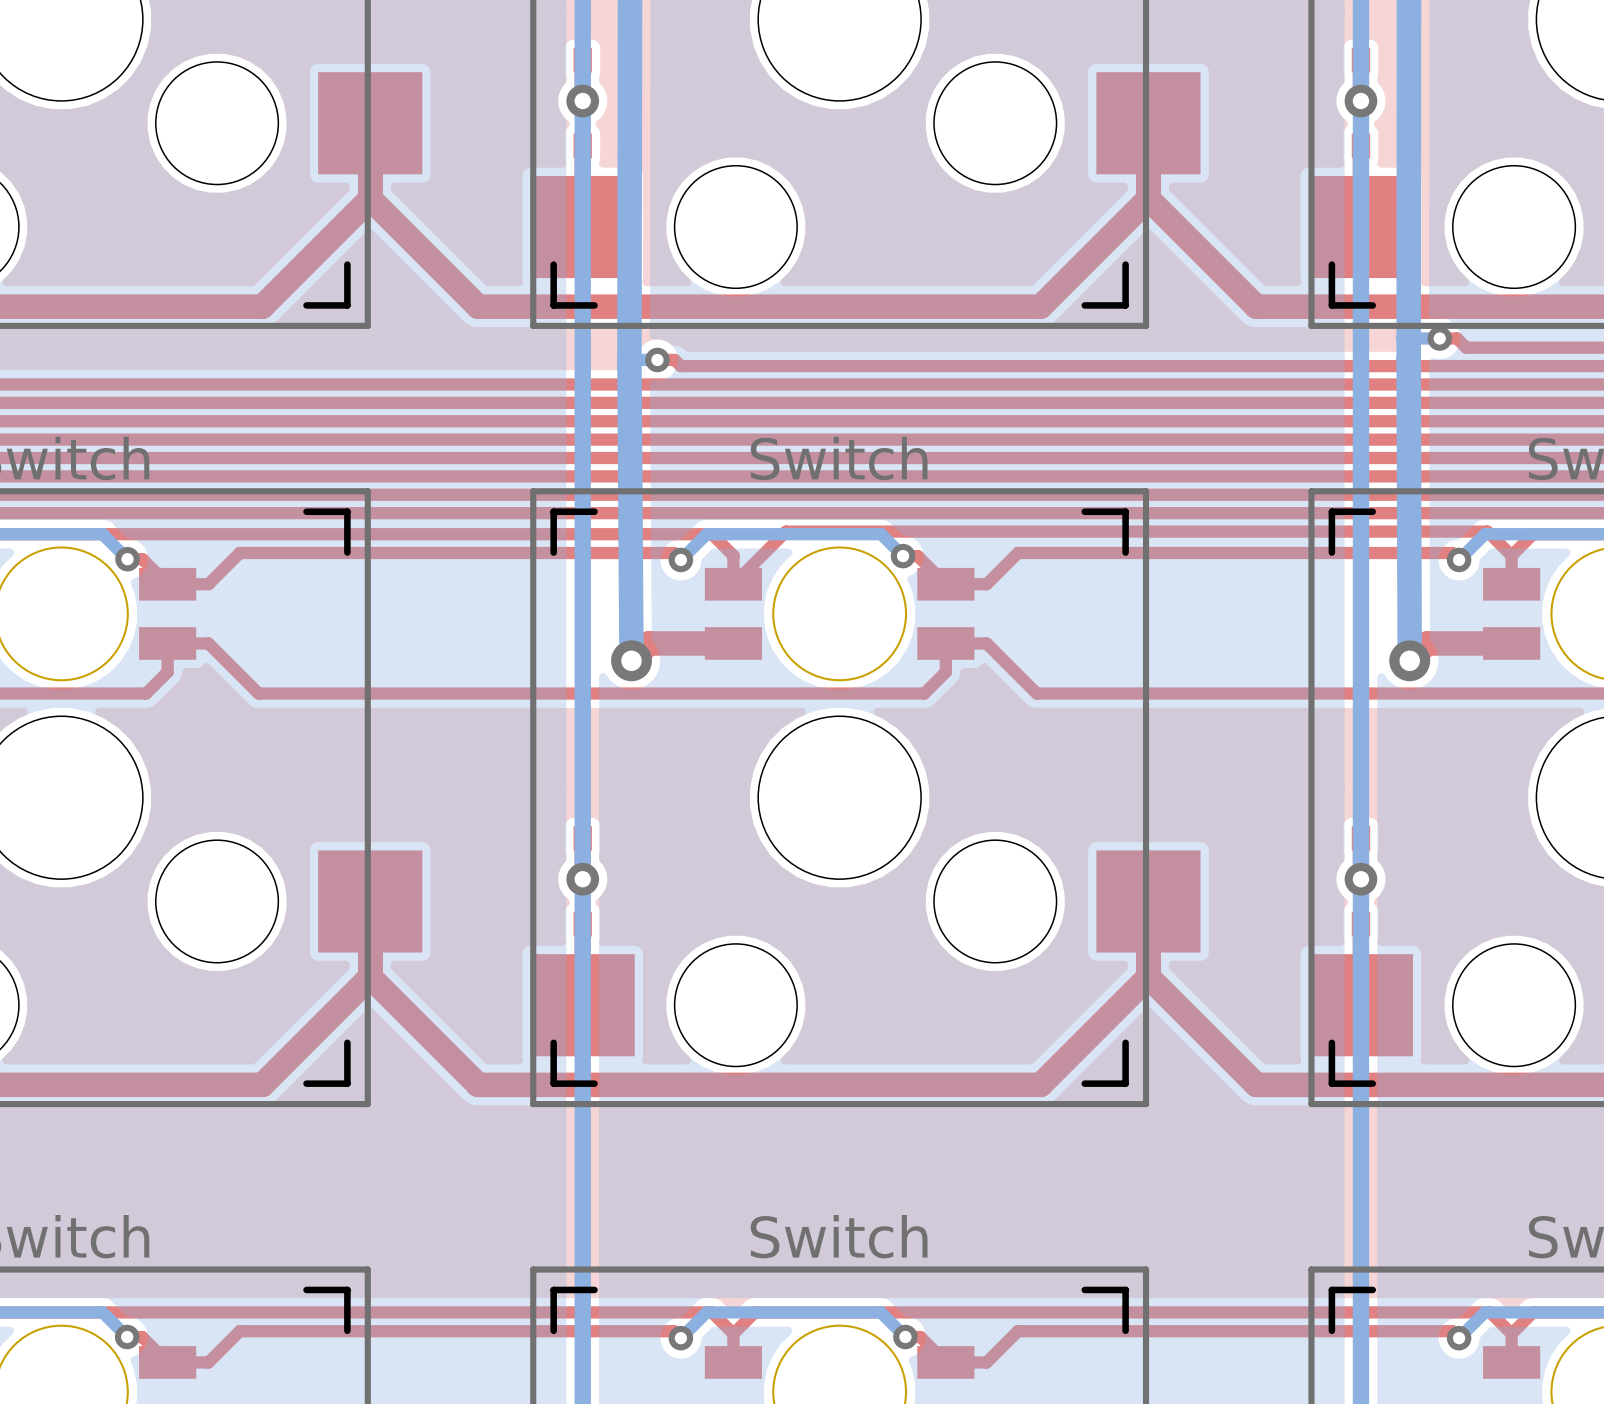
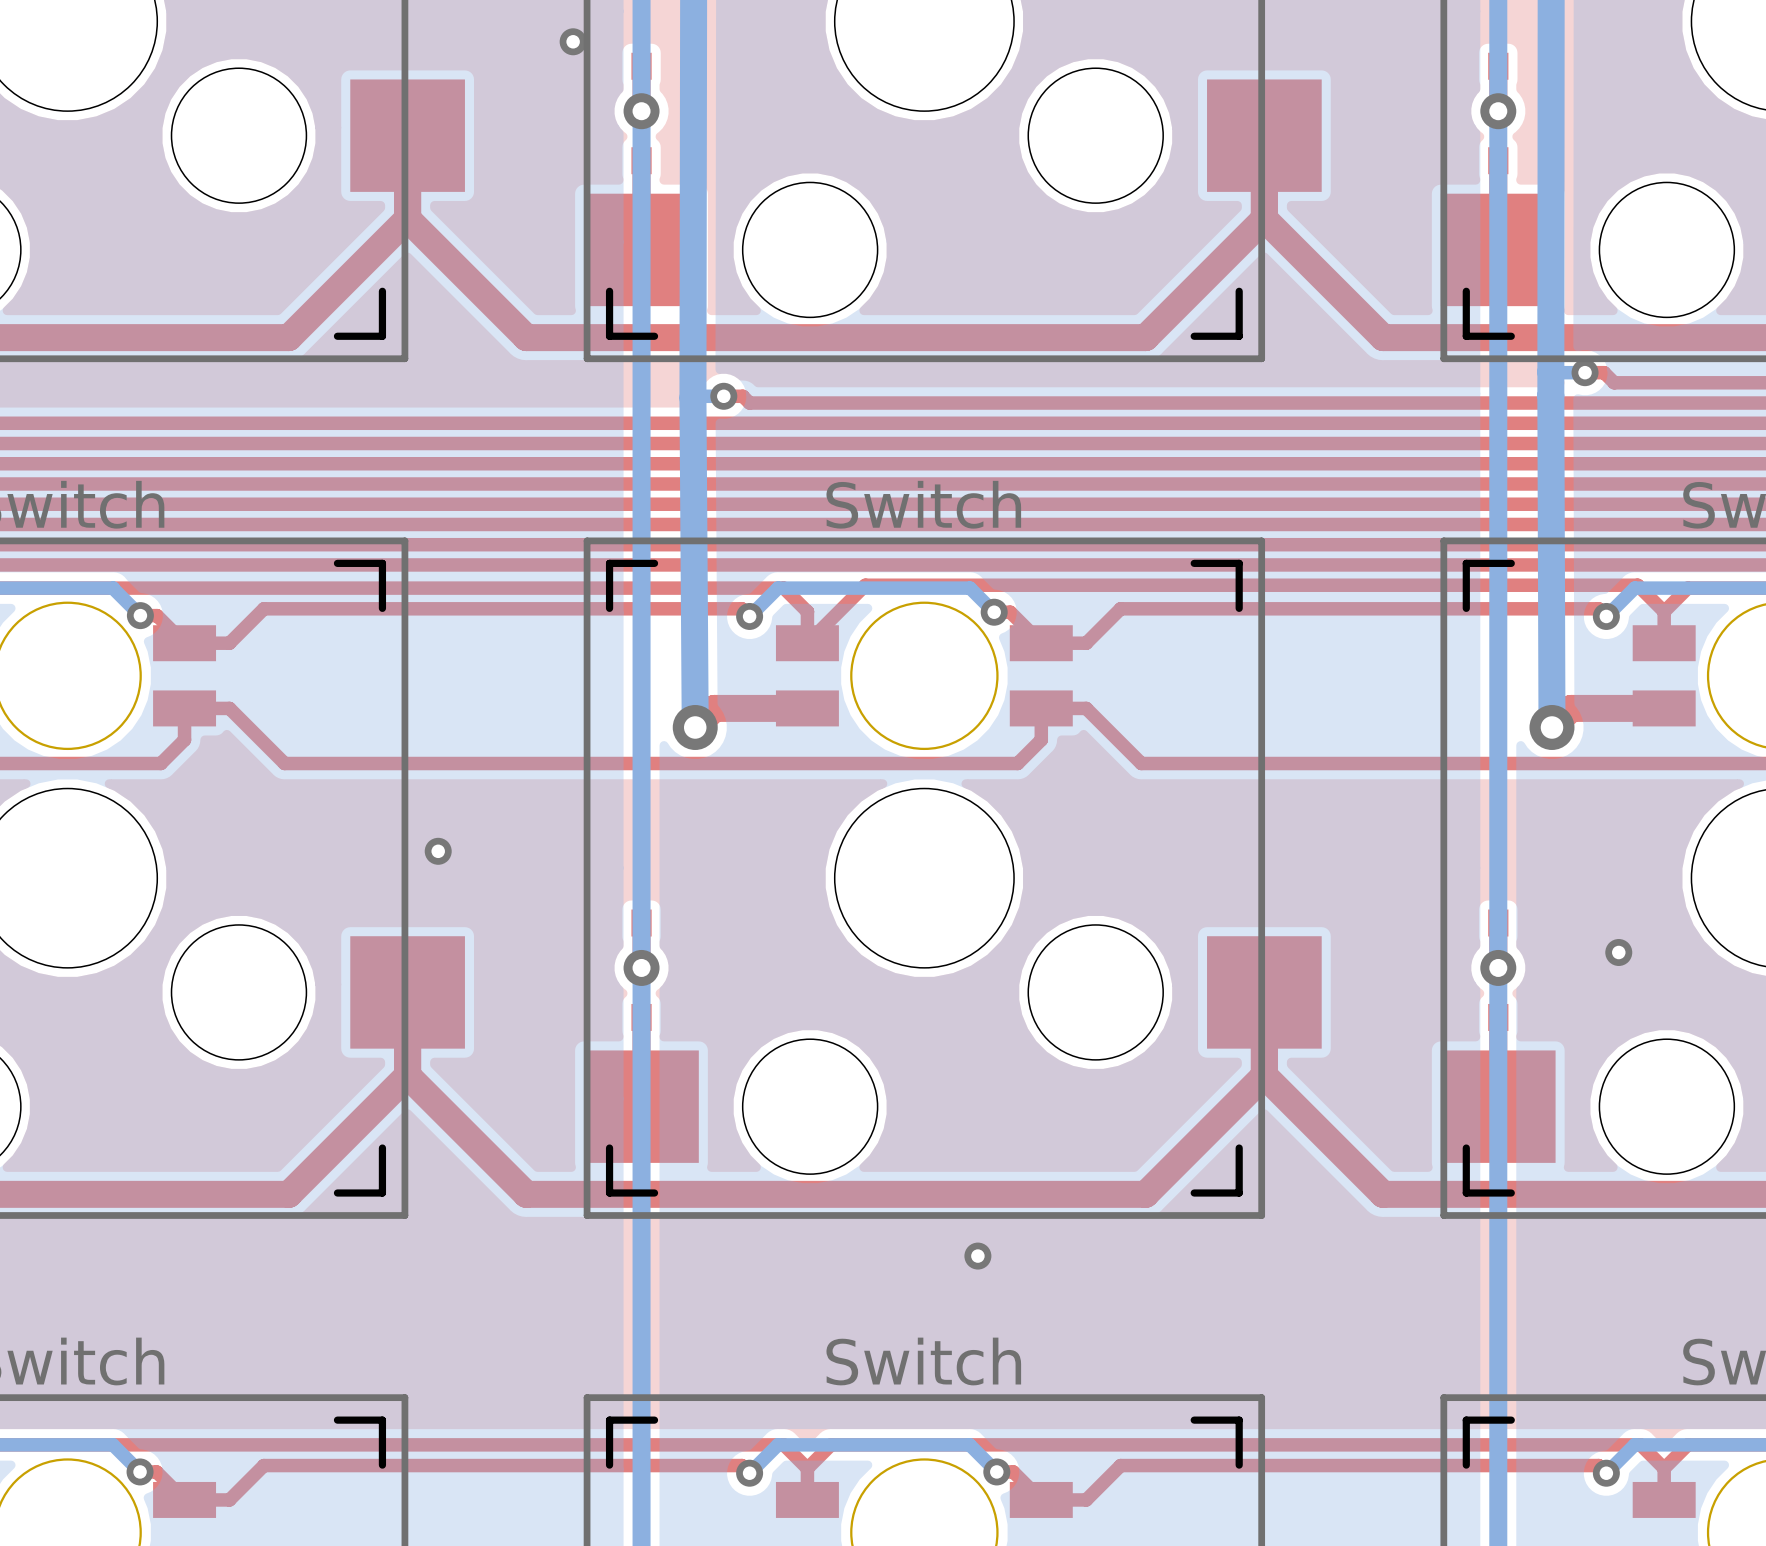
via: none -> (573, 41)
via: none -> (438, 851)
via: none -> (1618, 952)
via: none -> (977, 1256)

